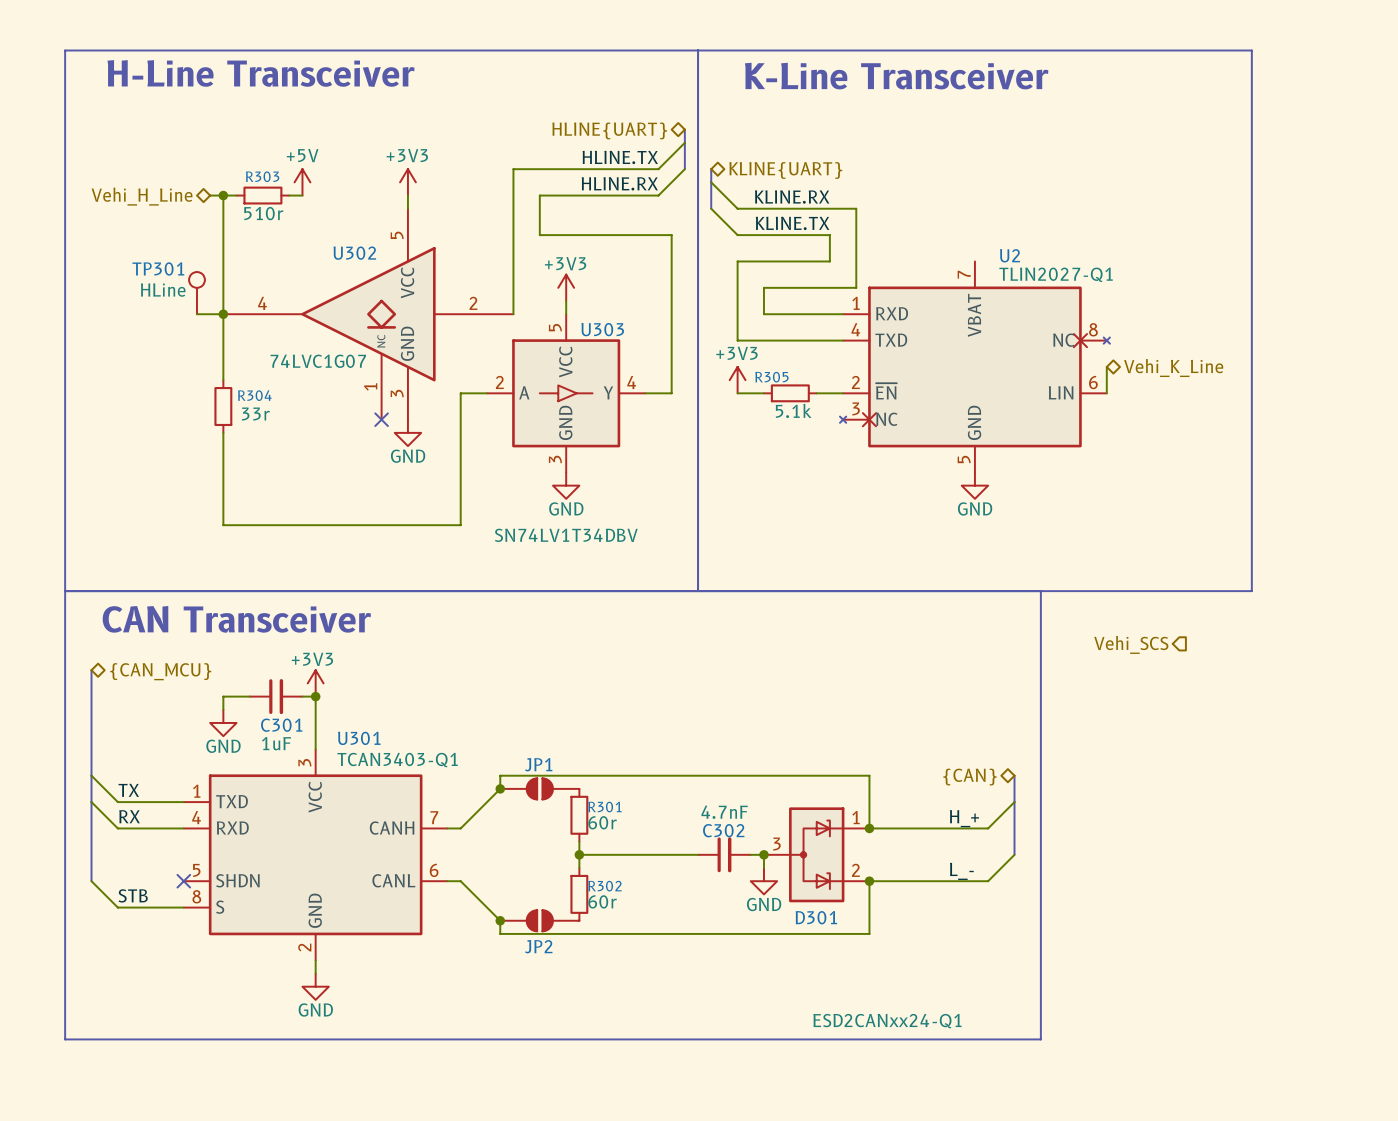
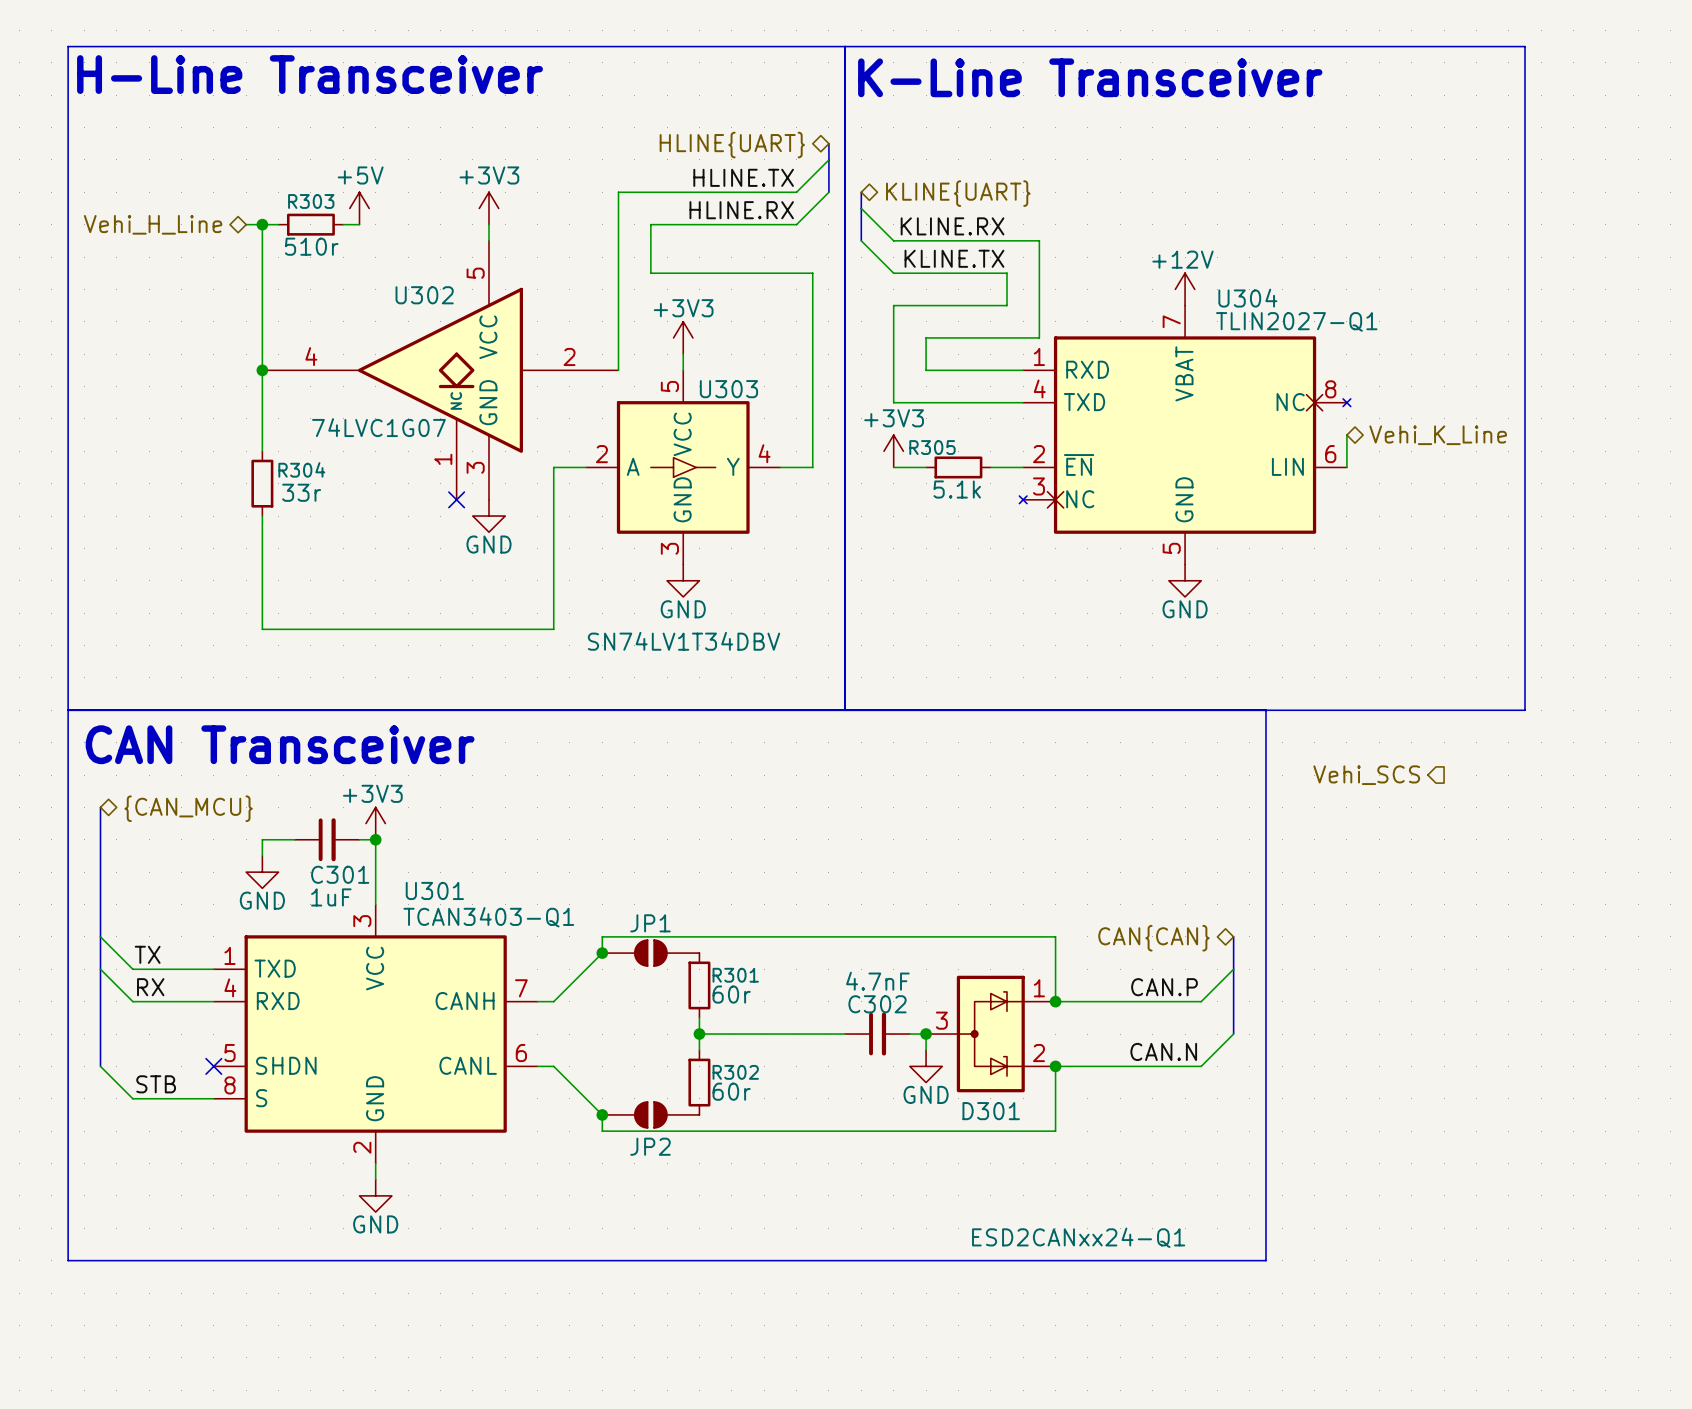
power symbol: none -> +12V (1185, 289)
U2 name: U2 (1009, 255) -> U304 (1247, 298)
TP301: HLine (196, 293) -> none
wire: (196, 314) (223, 314) -> none
hierarchical label: {CAN} (970, 777) -> CAN{CAN} (1153, 938)
label: none -> CAN.P (1164, 987)
label: H_+ (964, 818) -> none
label: none -> CAN.N (1163, 1051)
label: L_- (961, 871) -> none

